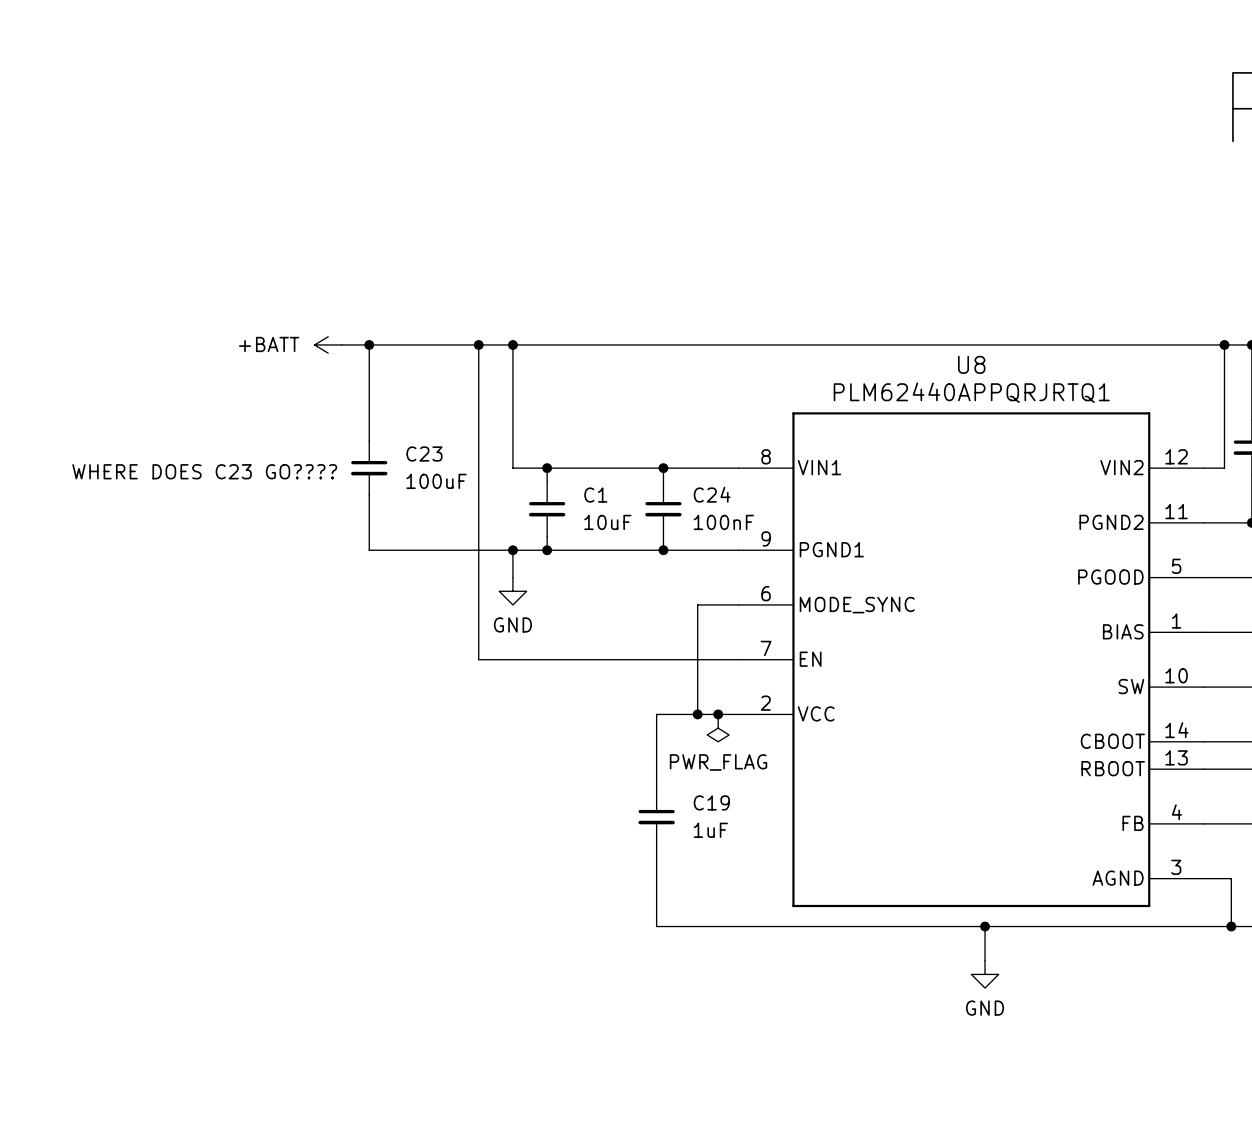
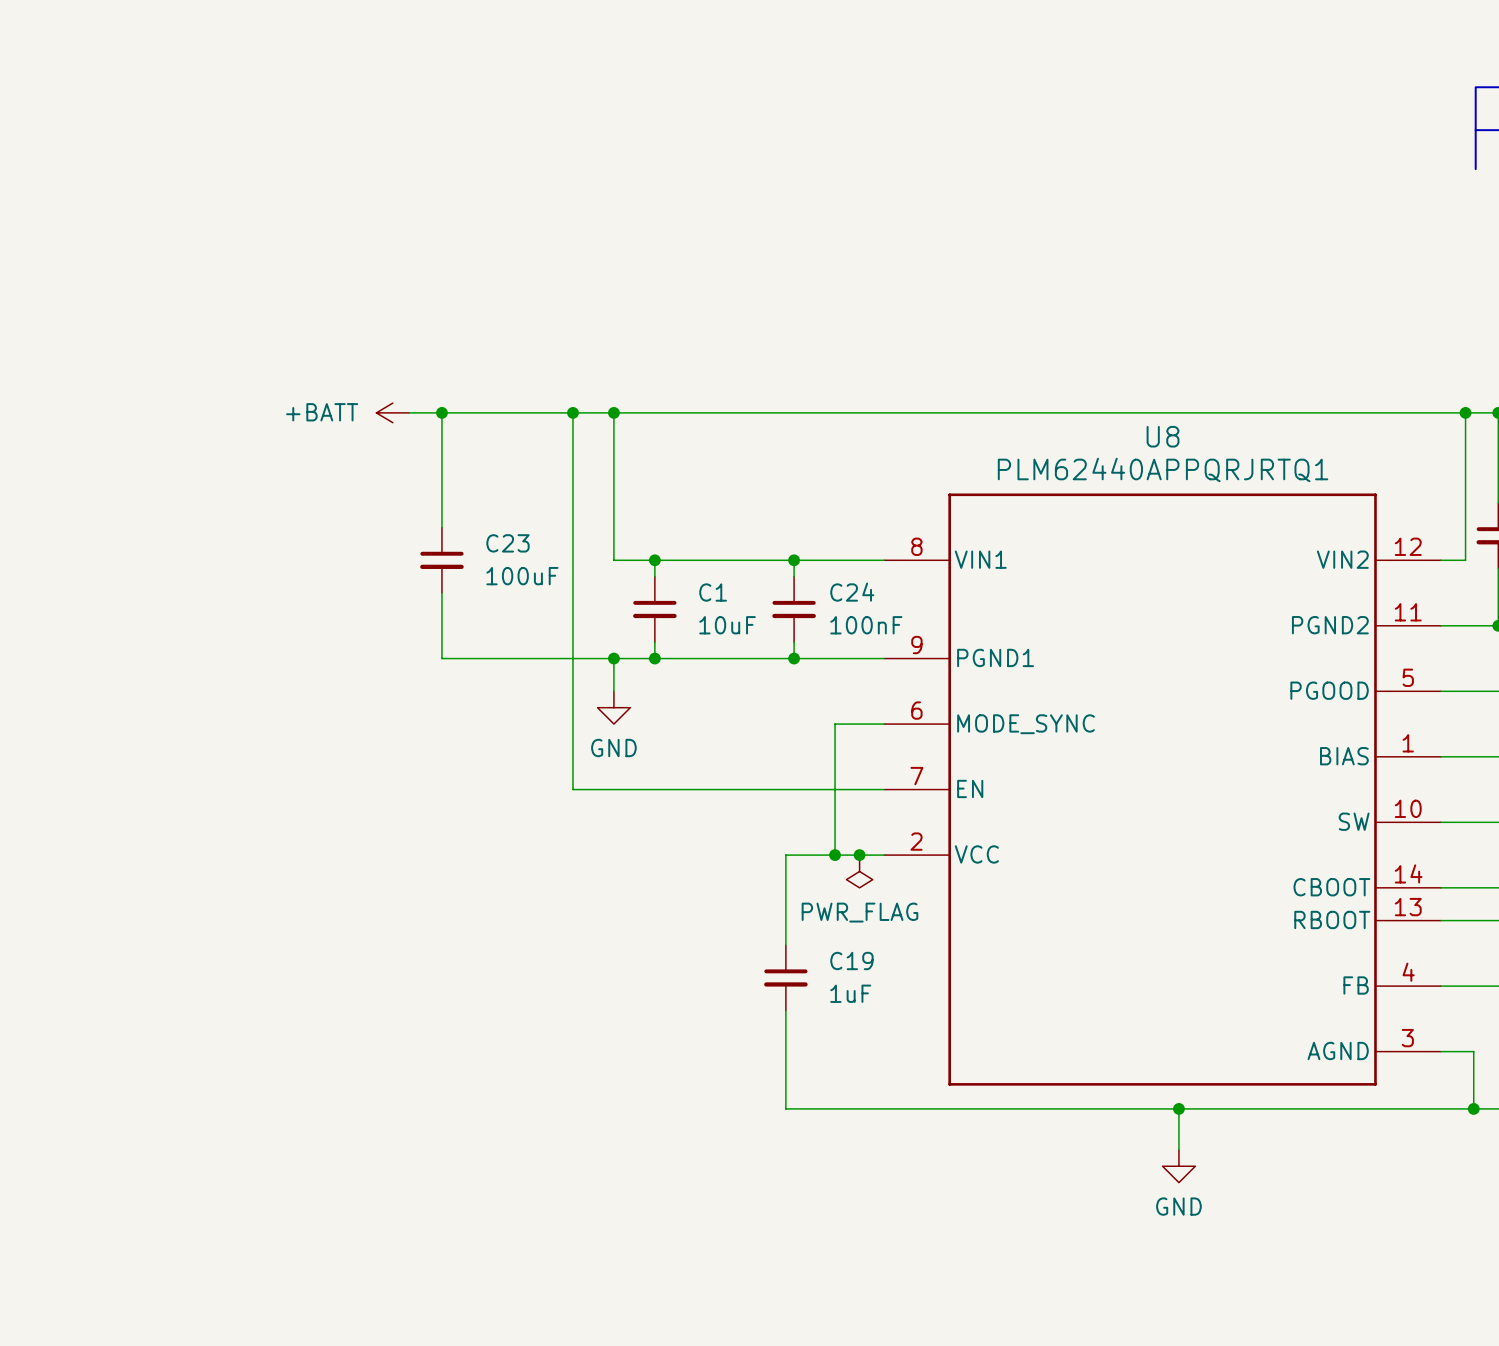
text: WHERE DOES C23 GO???? (204, 471) -> none

